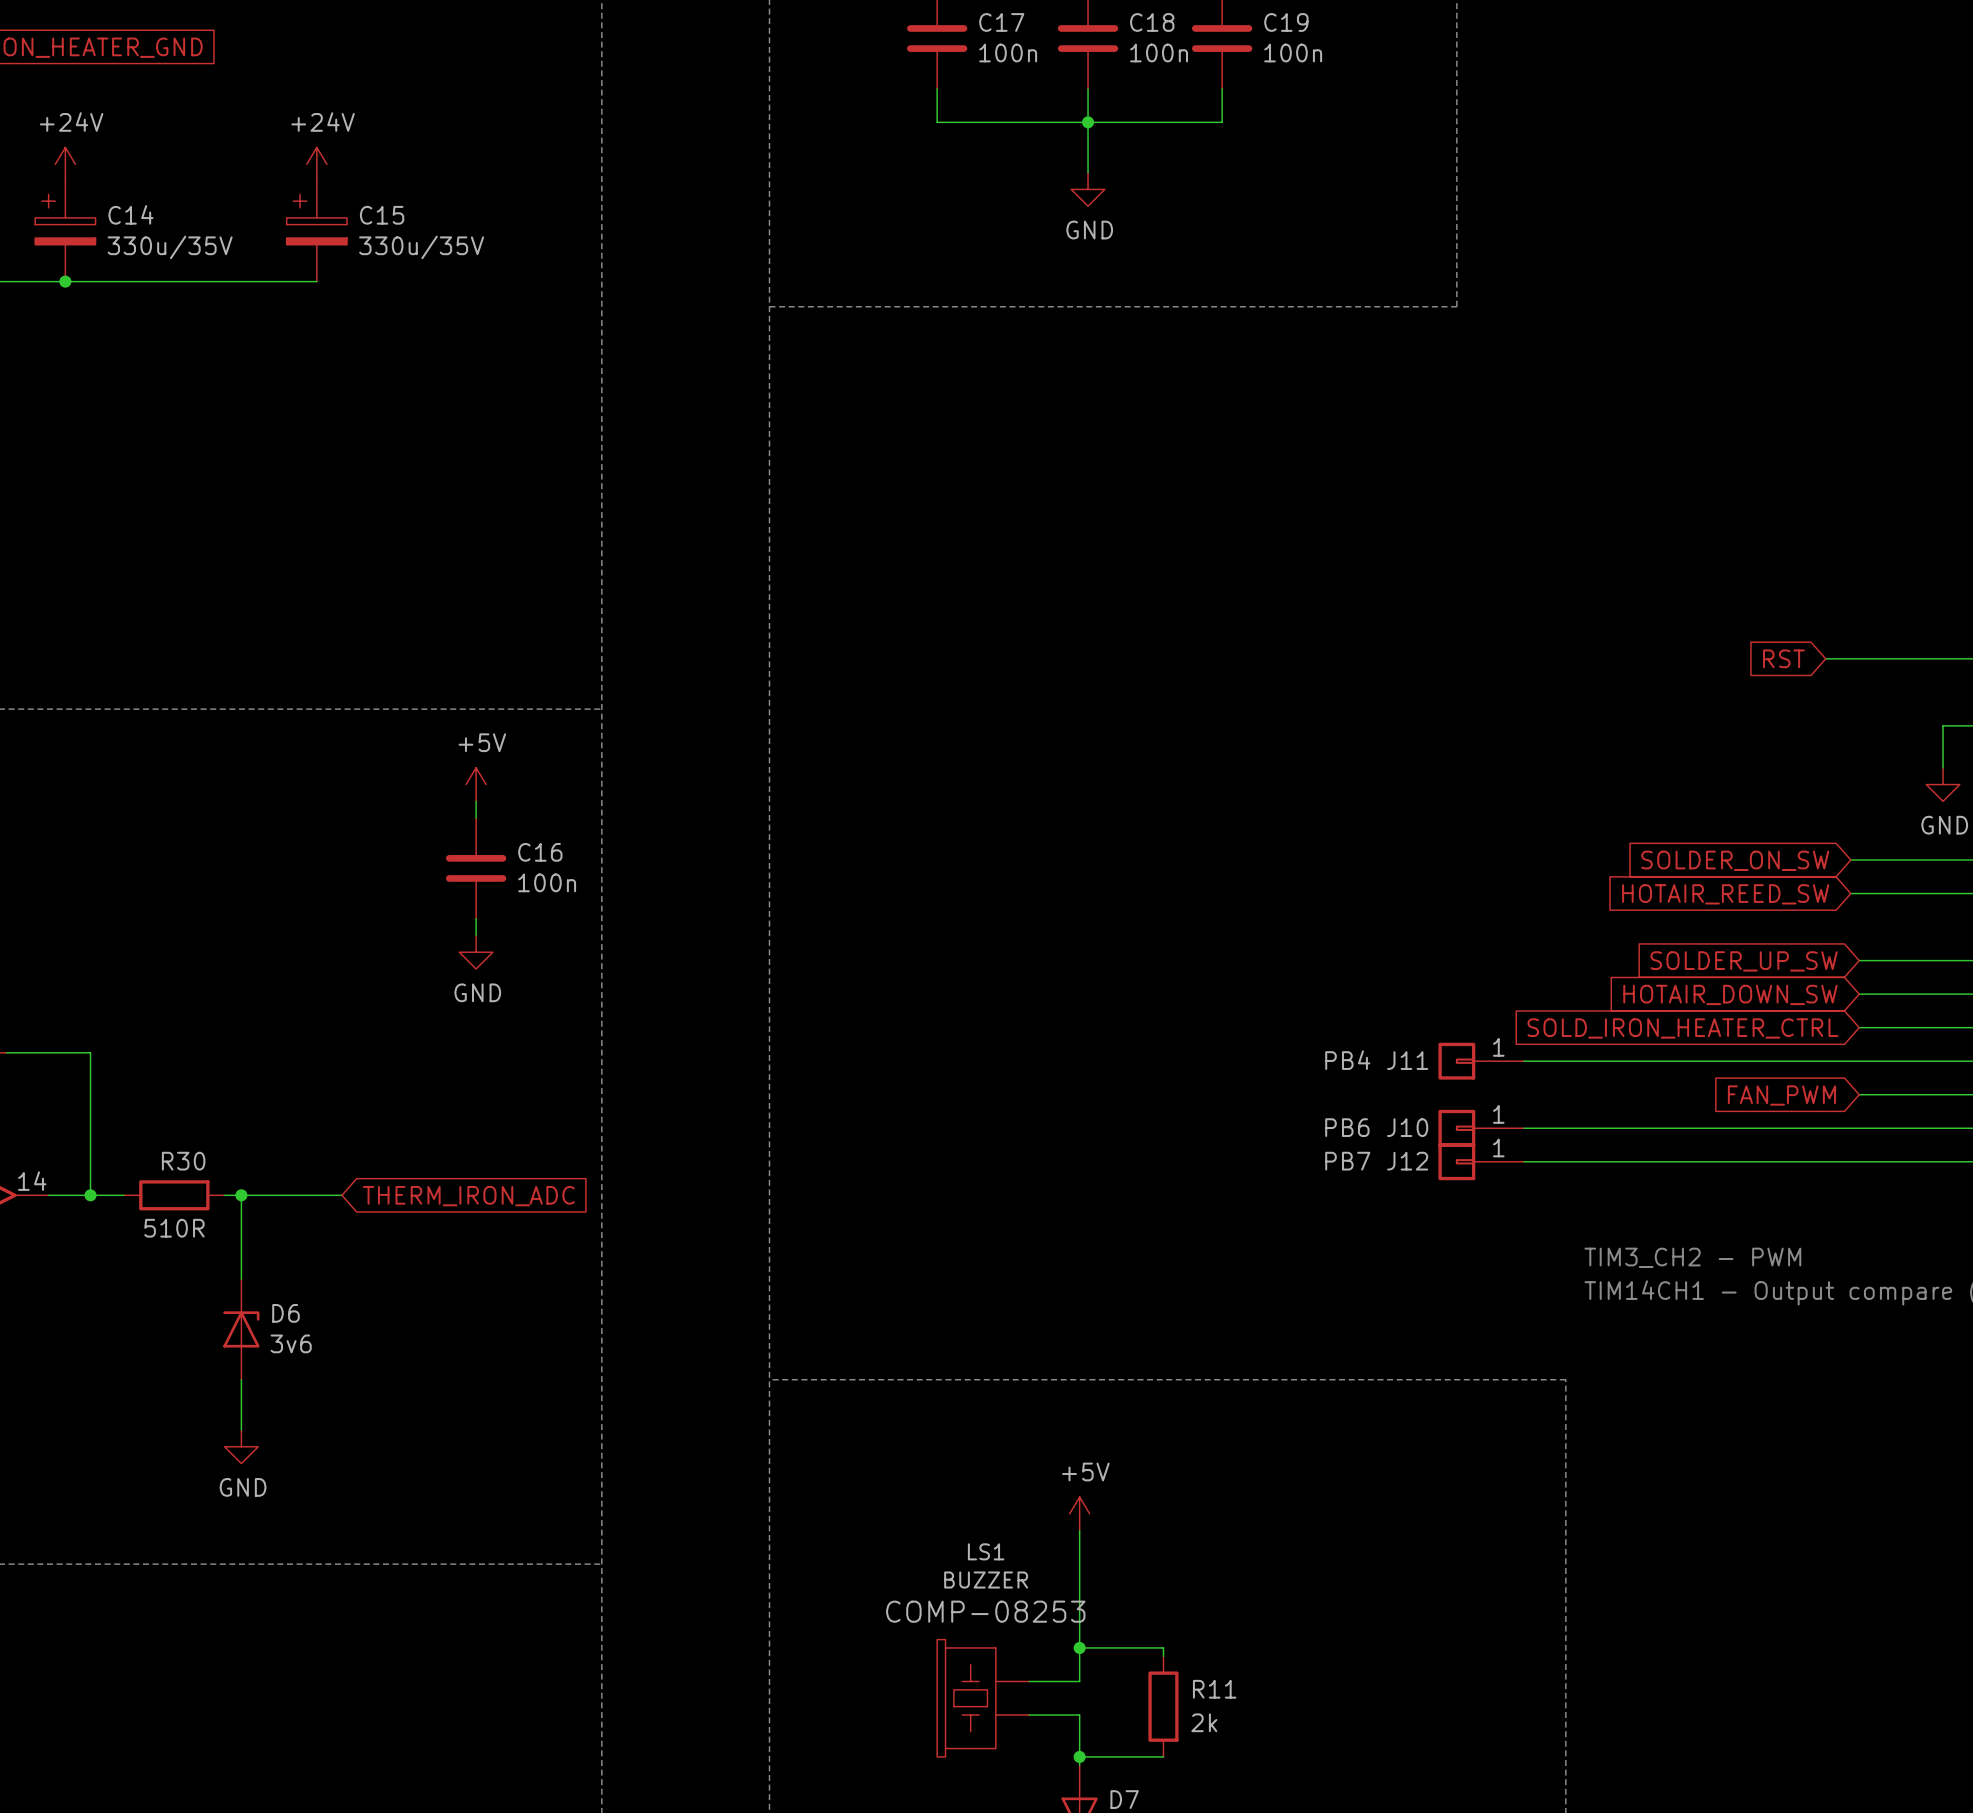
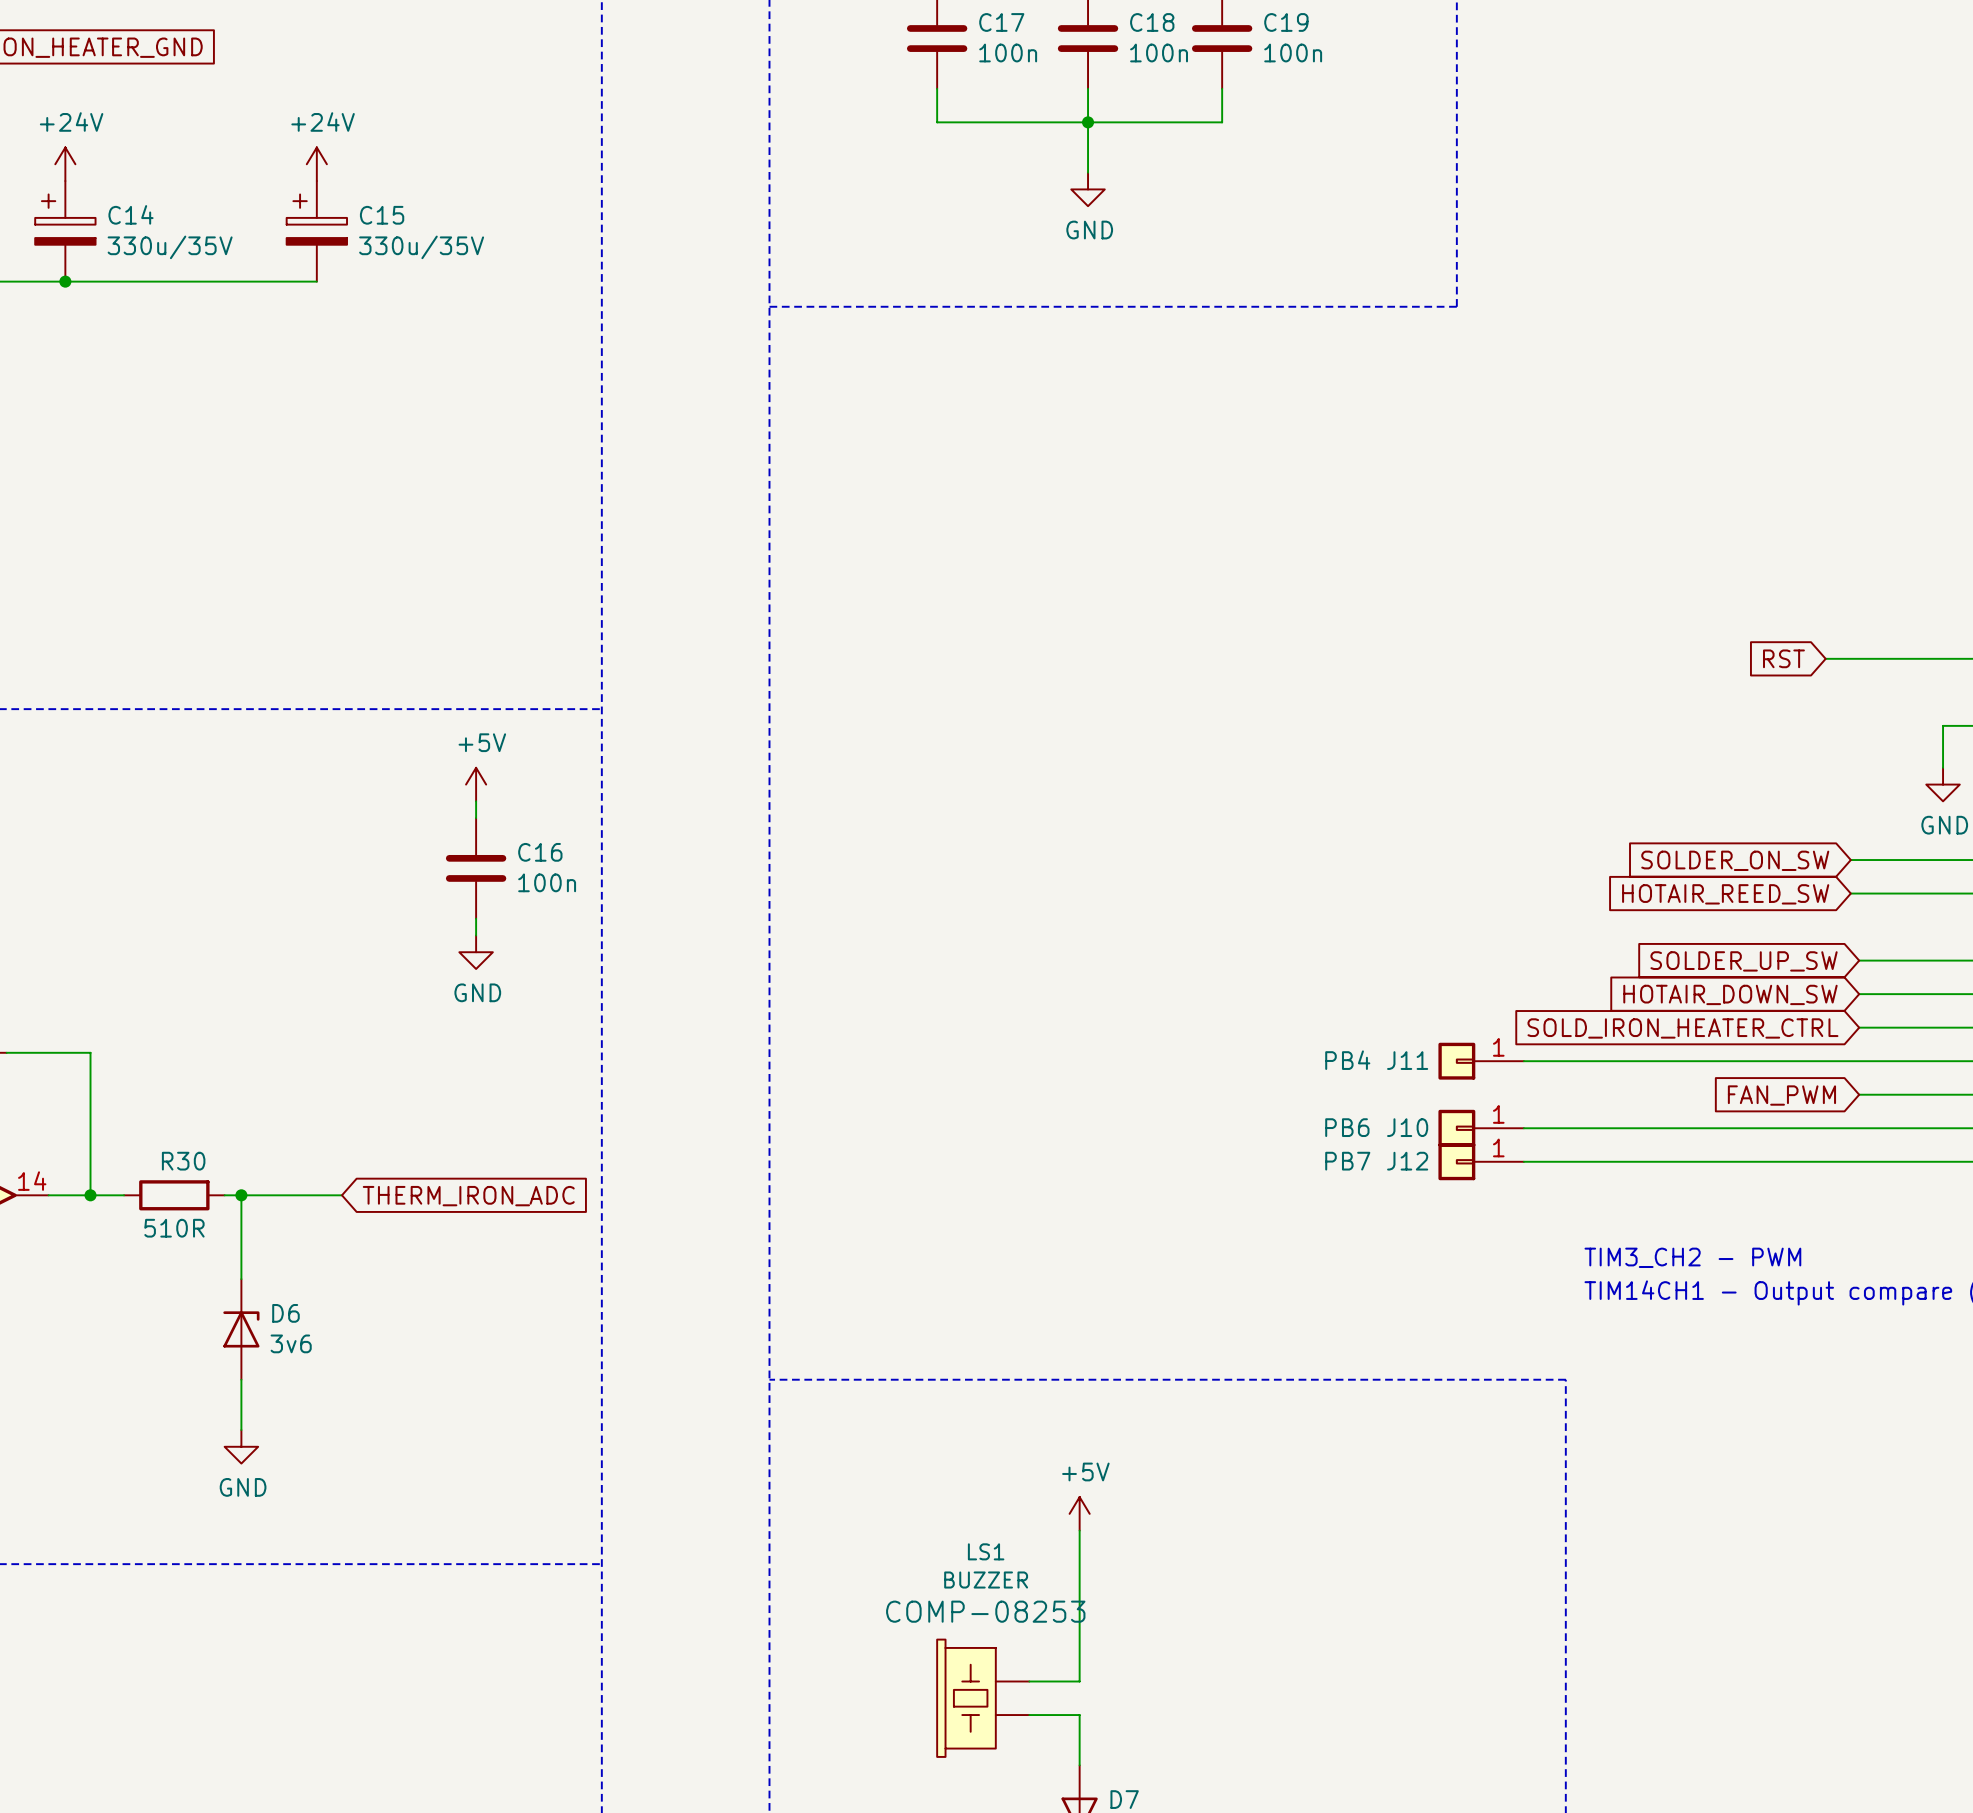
wire: (1079, 1647) (1163, 1647) (1163, 1656) -> none
junction: (1079, 1647) -> none
R11: 2k (1163, 1706) -> none
wire: (1079, 1756) (1163, 1756) -> none
junction: (1079, 1756) -> none

